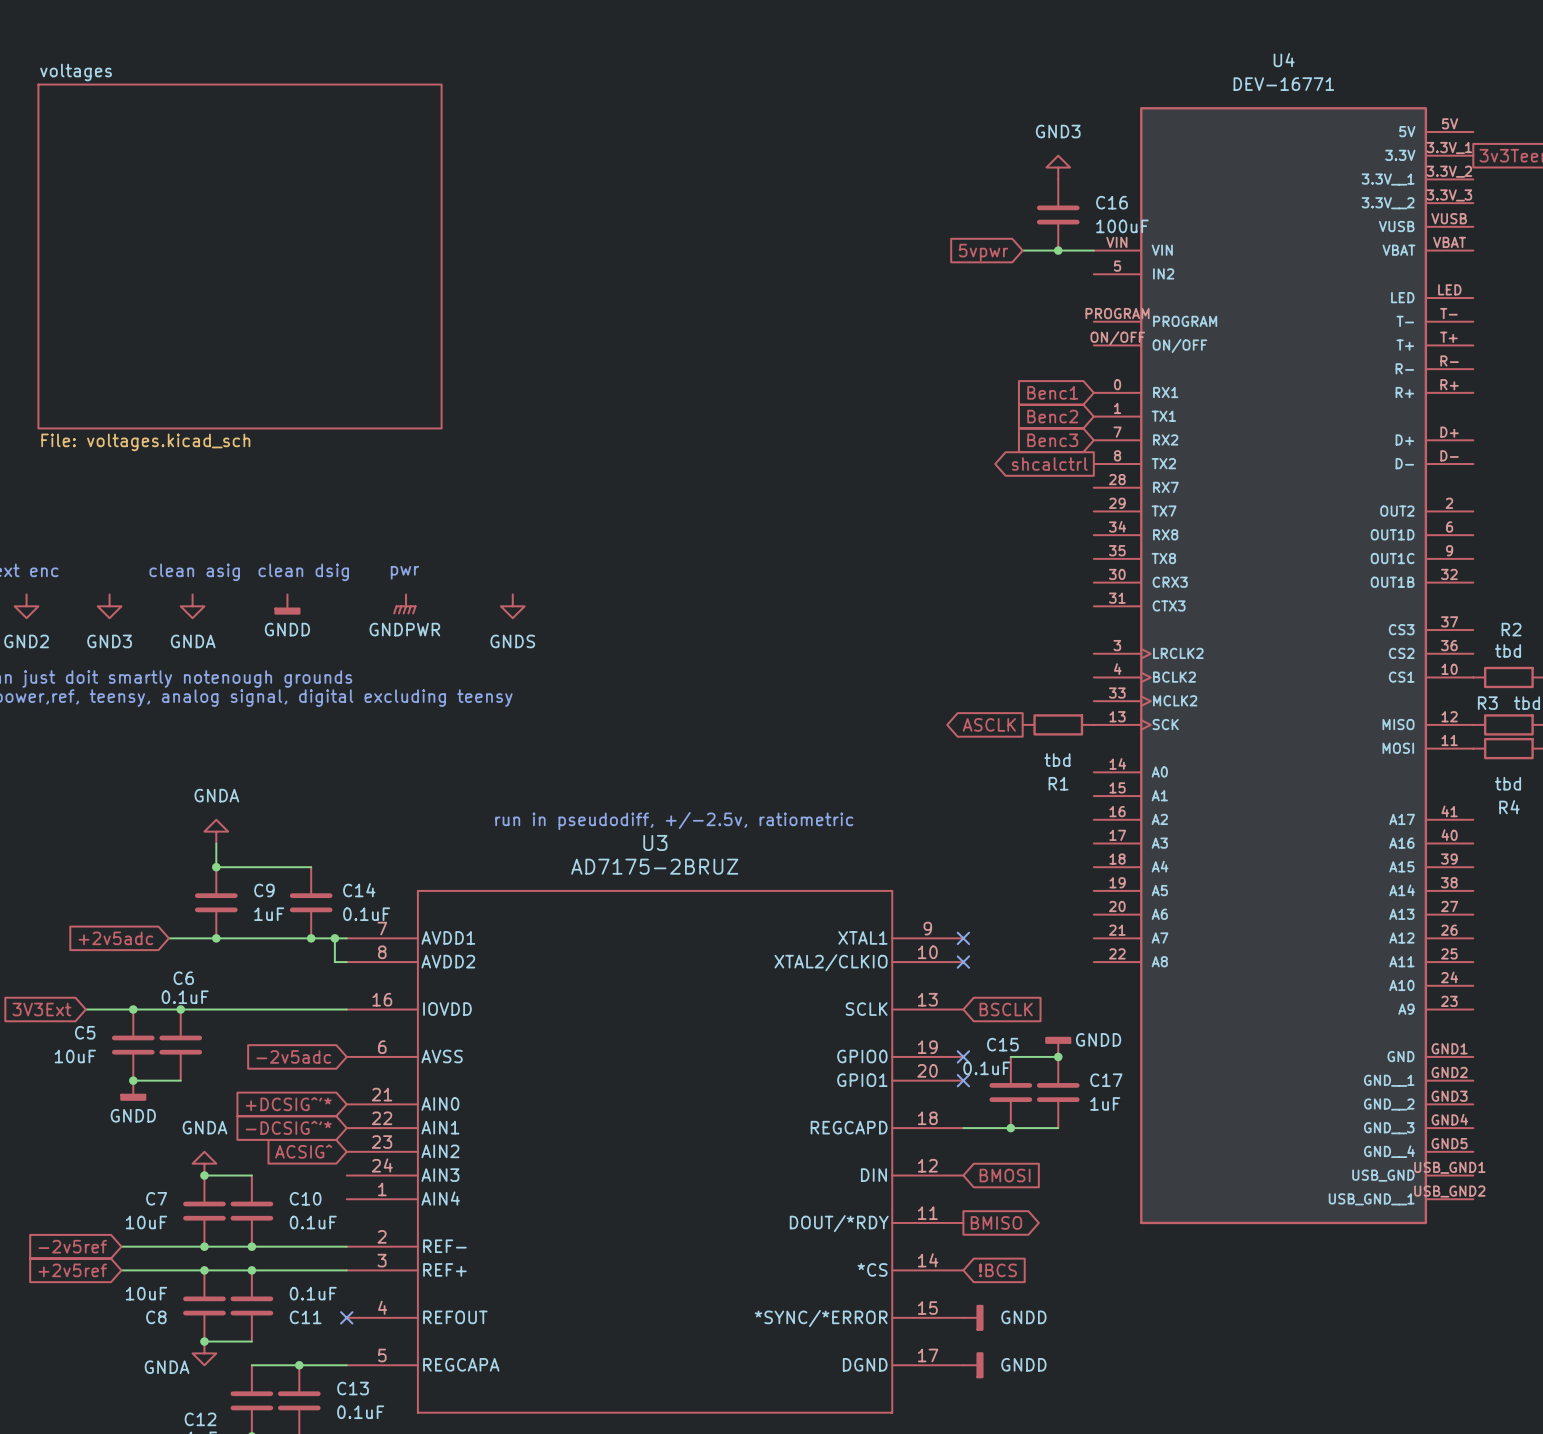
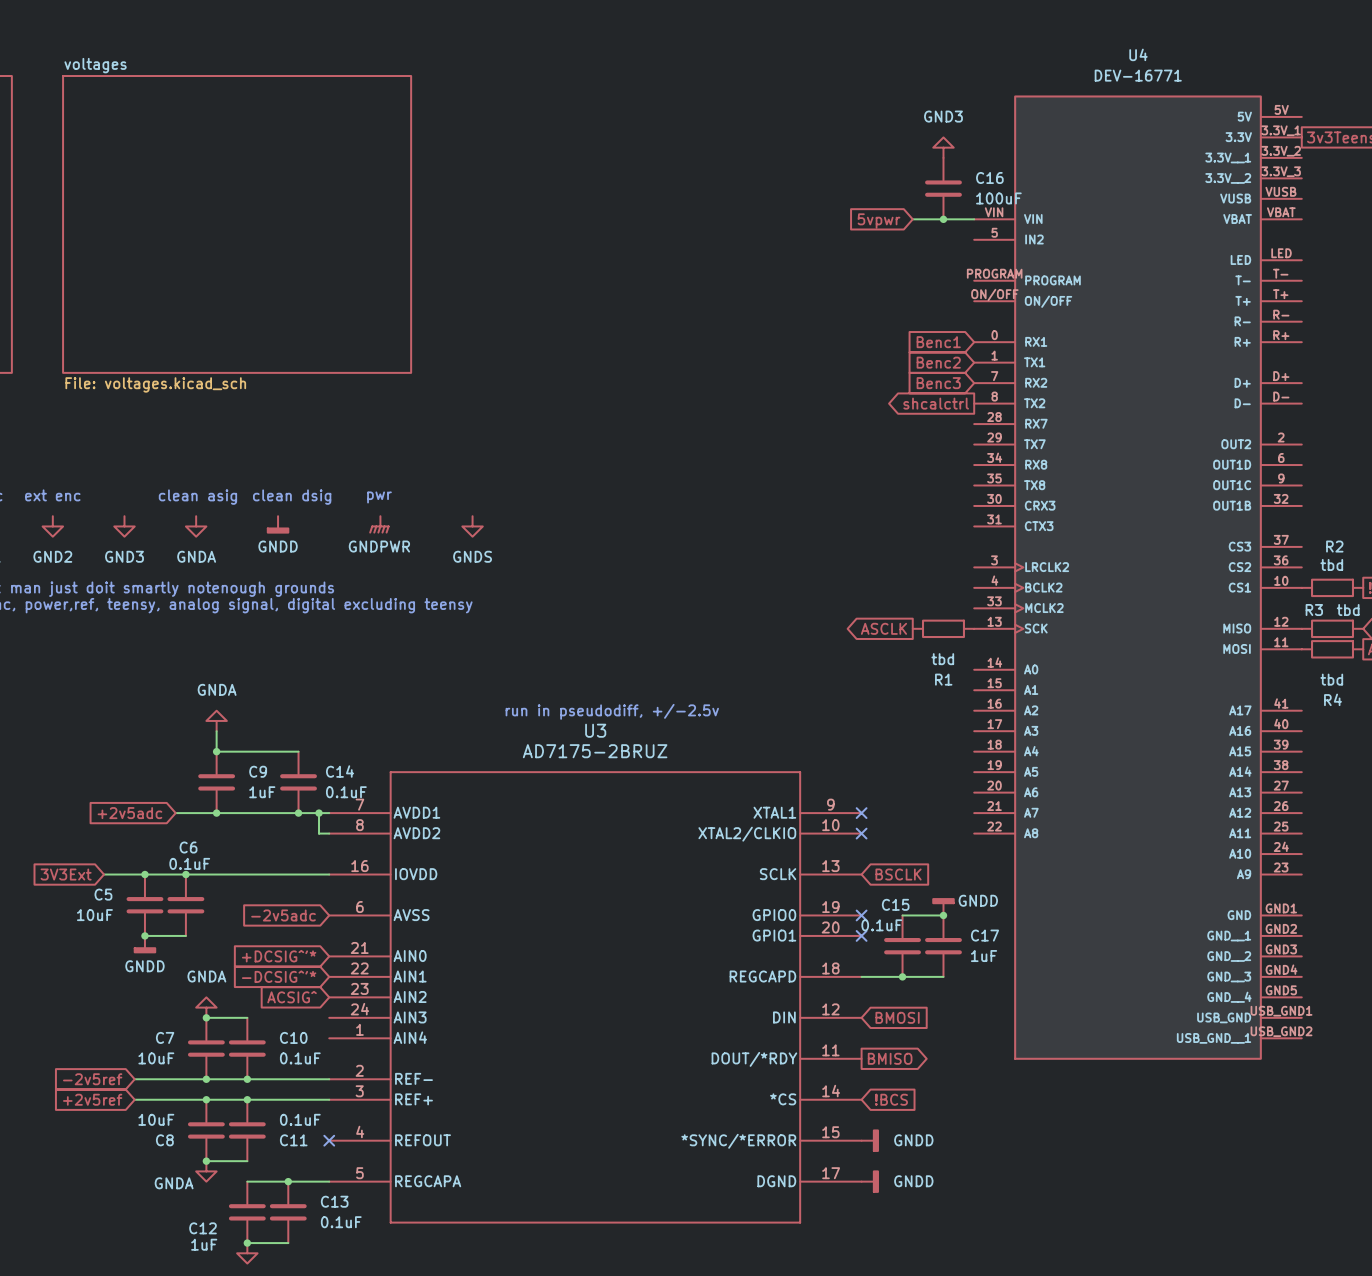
text: run in pseudodiff, +/-2.5v, ratiometric (674, 821) -> run in pseudodiff, +/-2.5v (612, 711)

